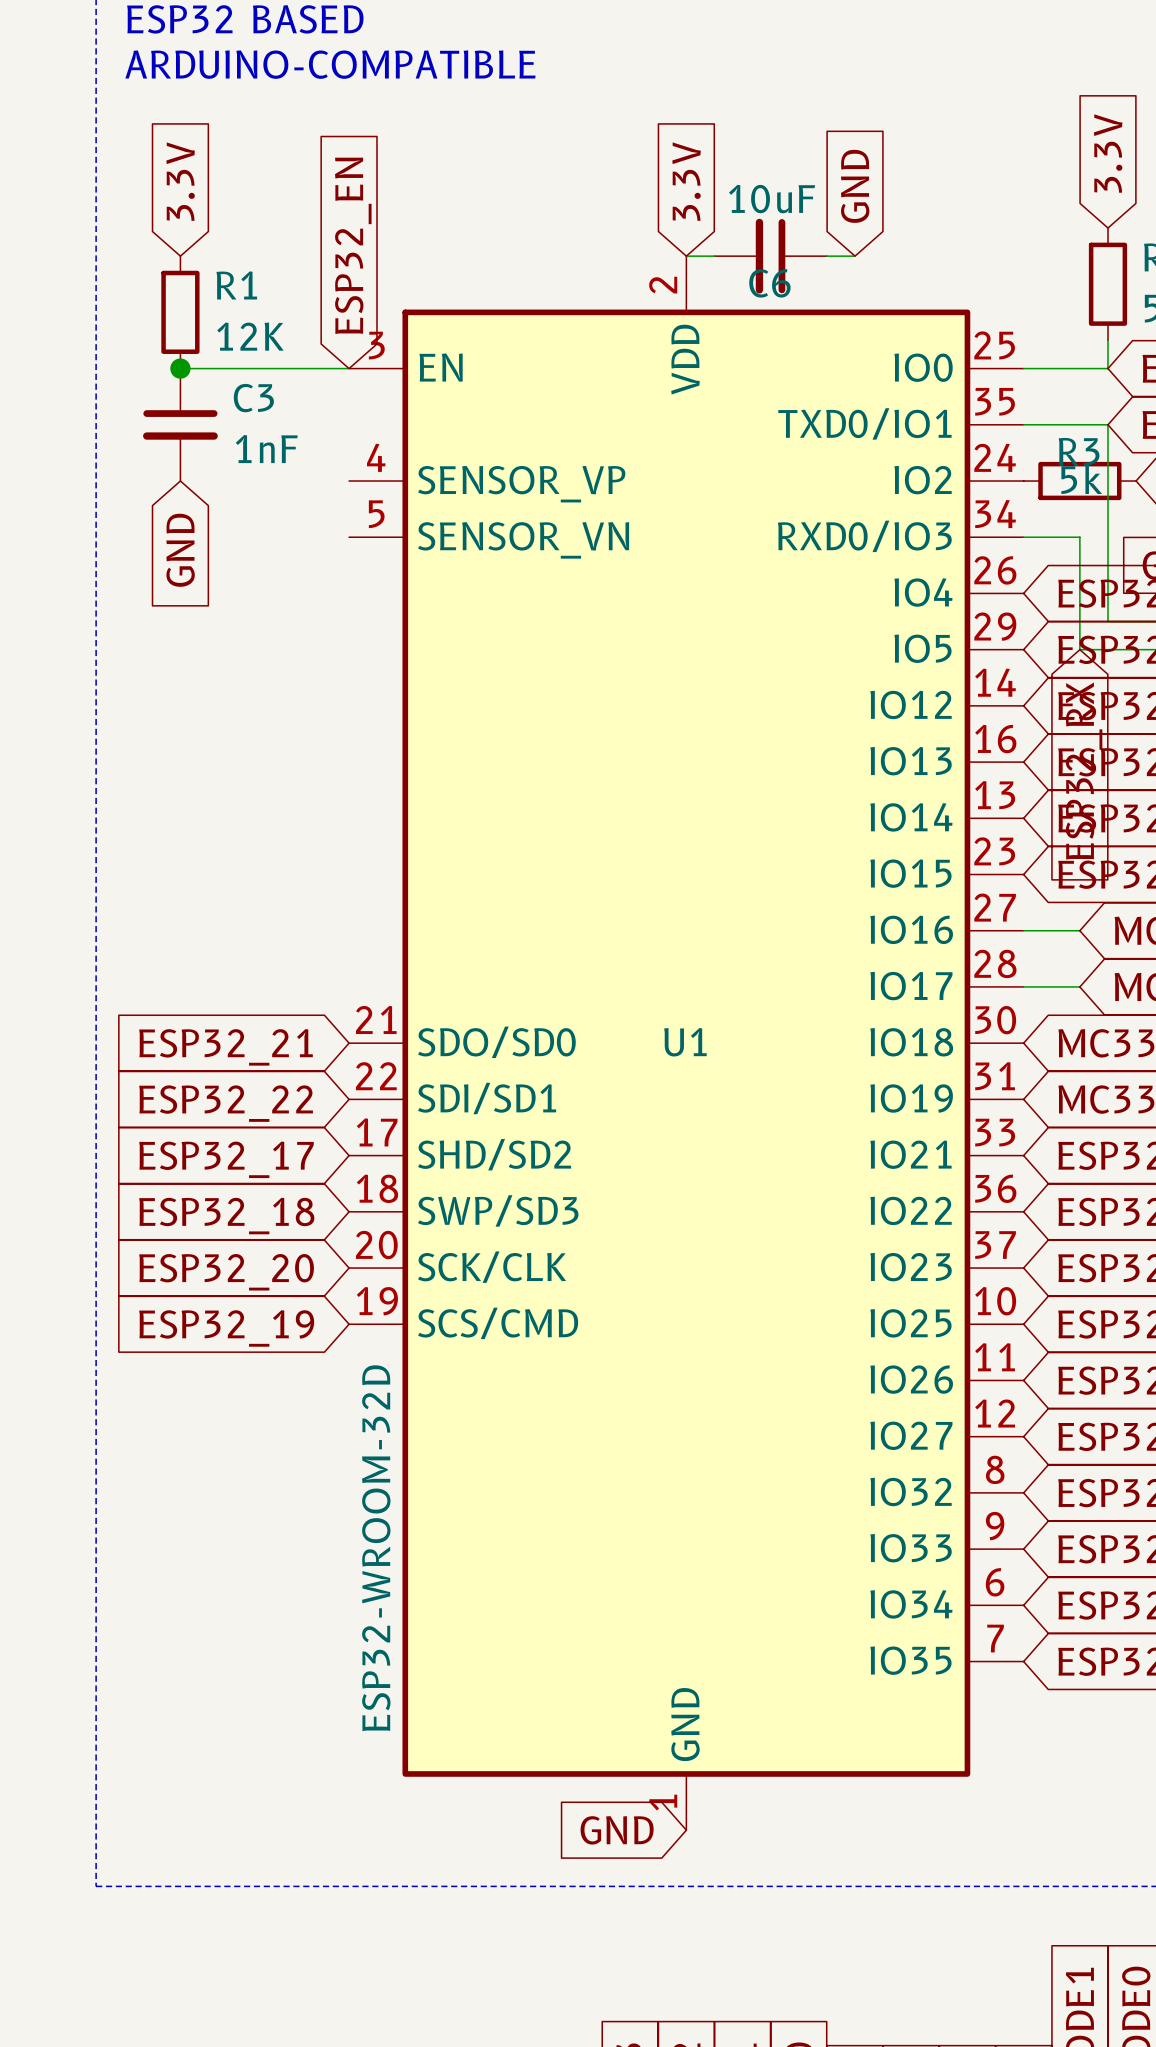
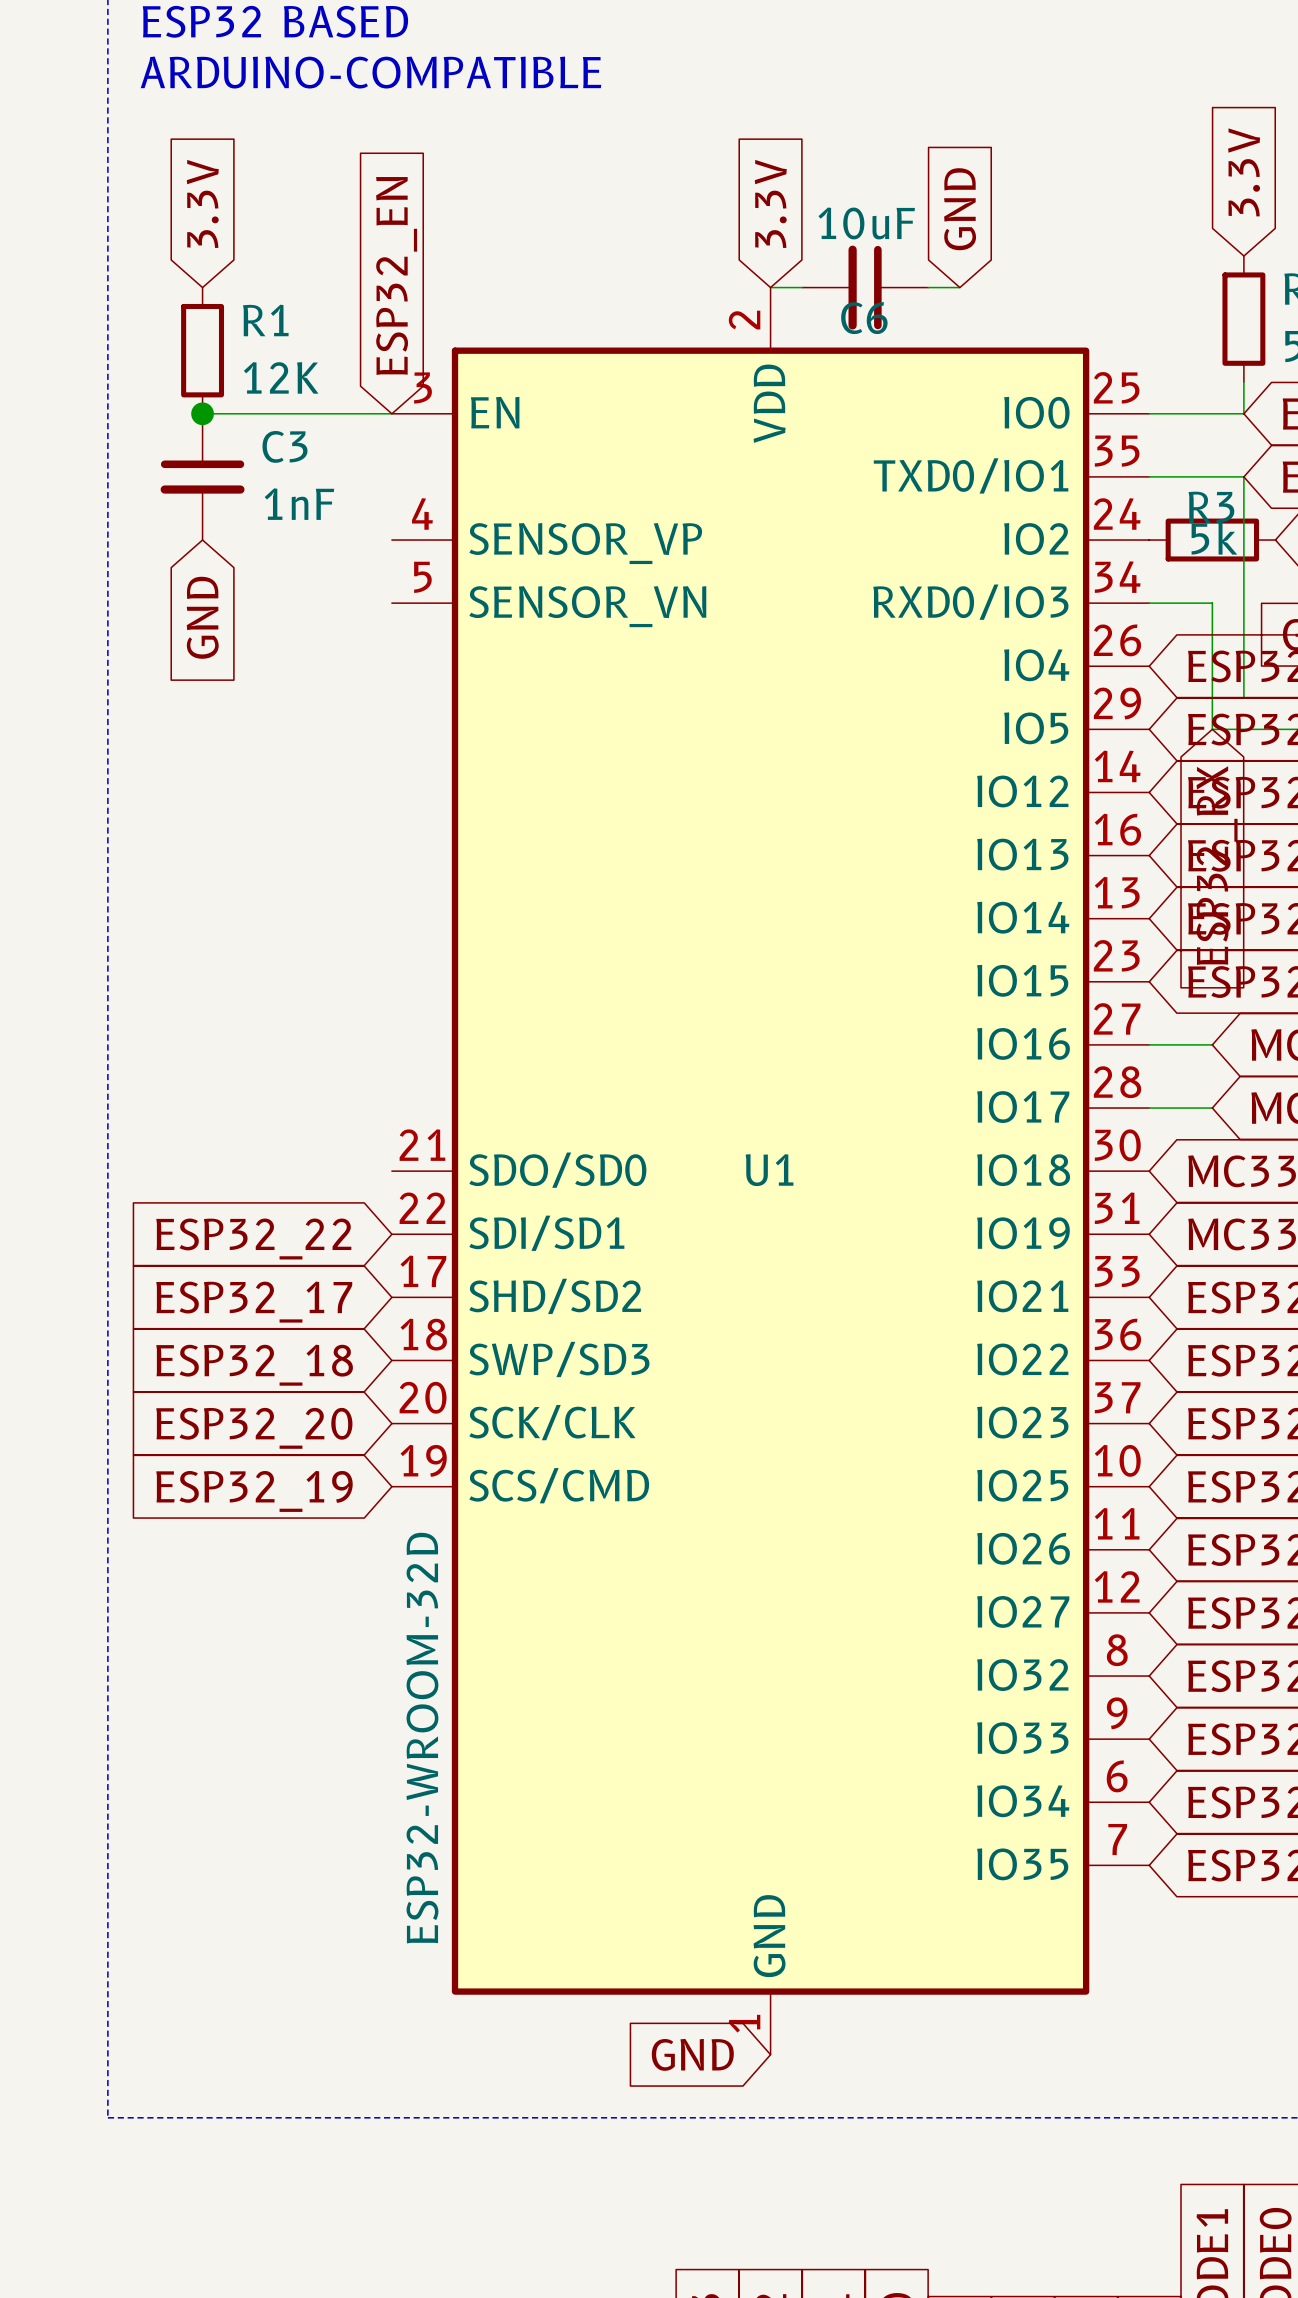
global label: ESP32_21 (226, 1047) -> none

